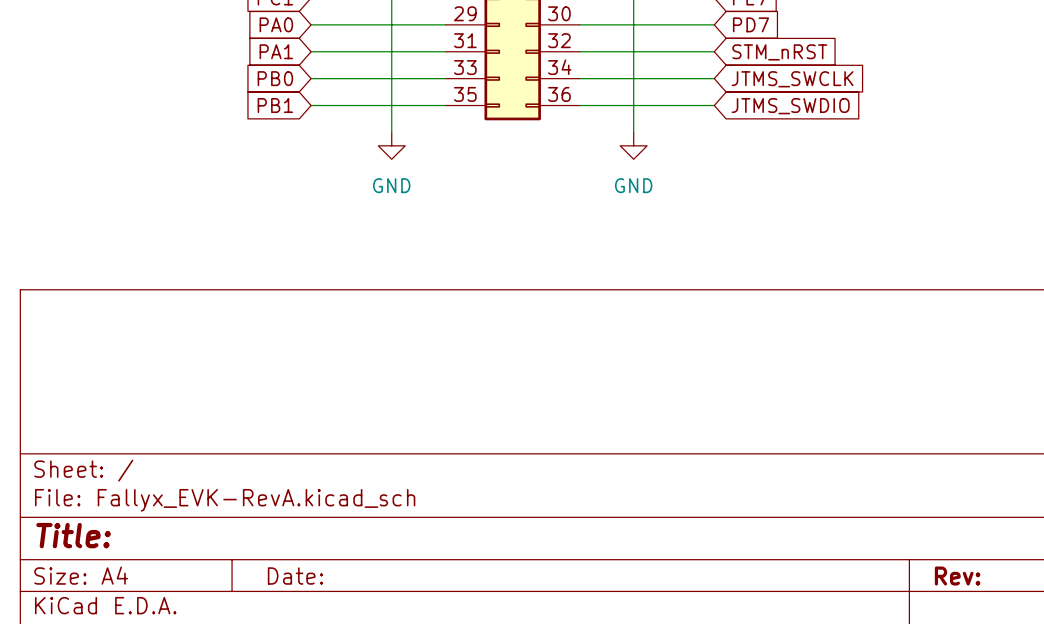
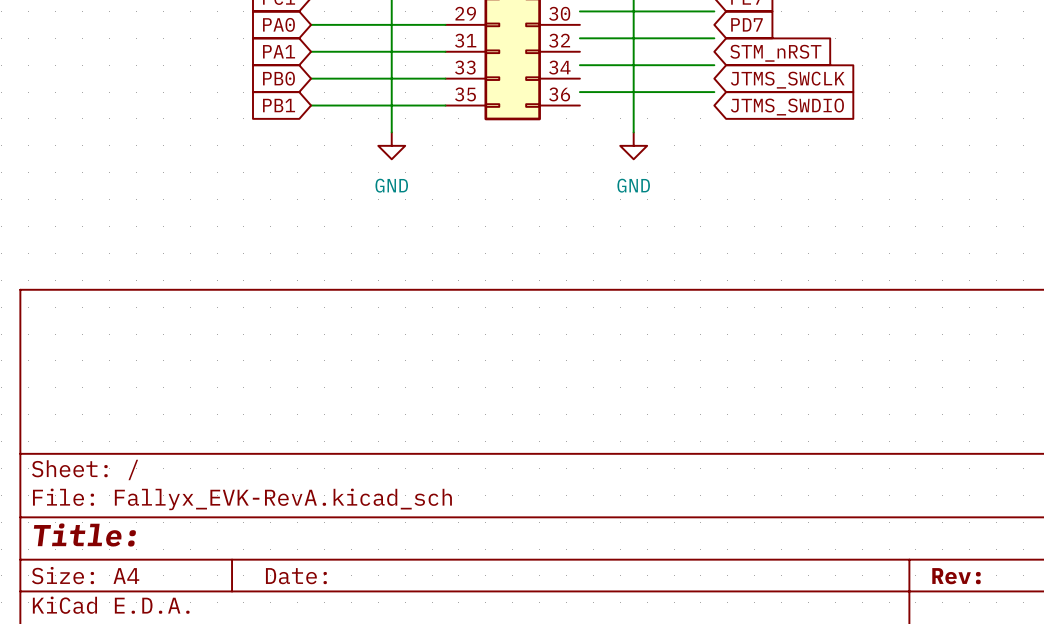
wire: (579, 24) (714, 24) -> (579, 11) (714, 11)
wire: (579, 51) (714, 51) -> (579, 38) (714, 38)
wire: (579, 78) (714, 78) -> (579, 65) (714, 65)
wire: (579, 105) (714, 105) -> (579, 92) (714, 92)

